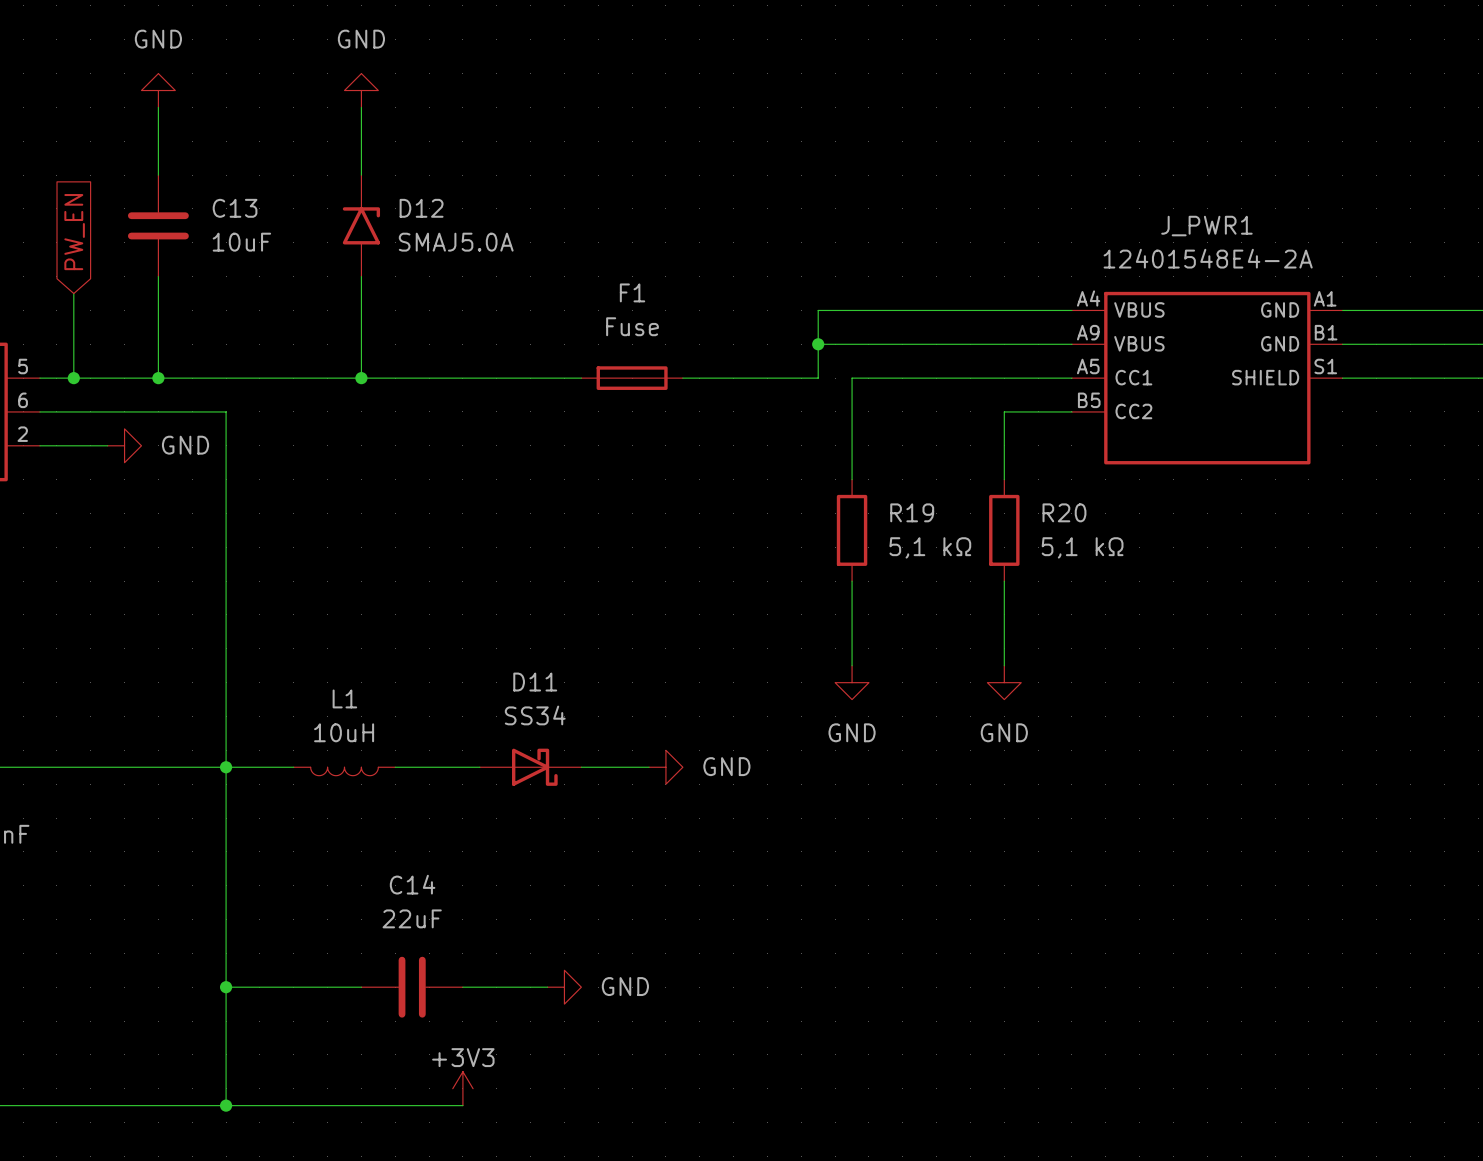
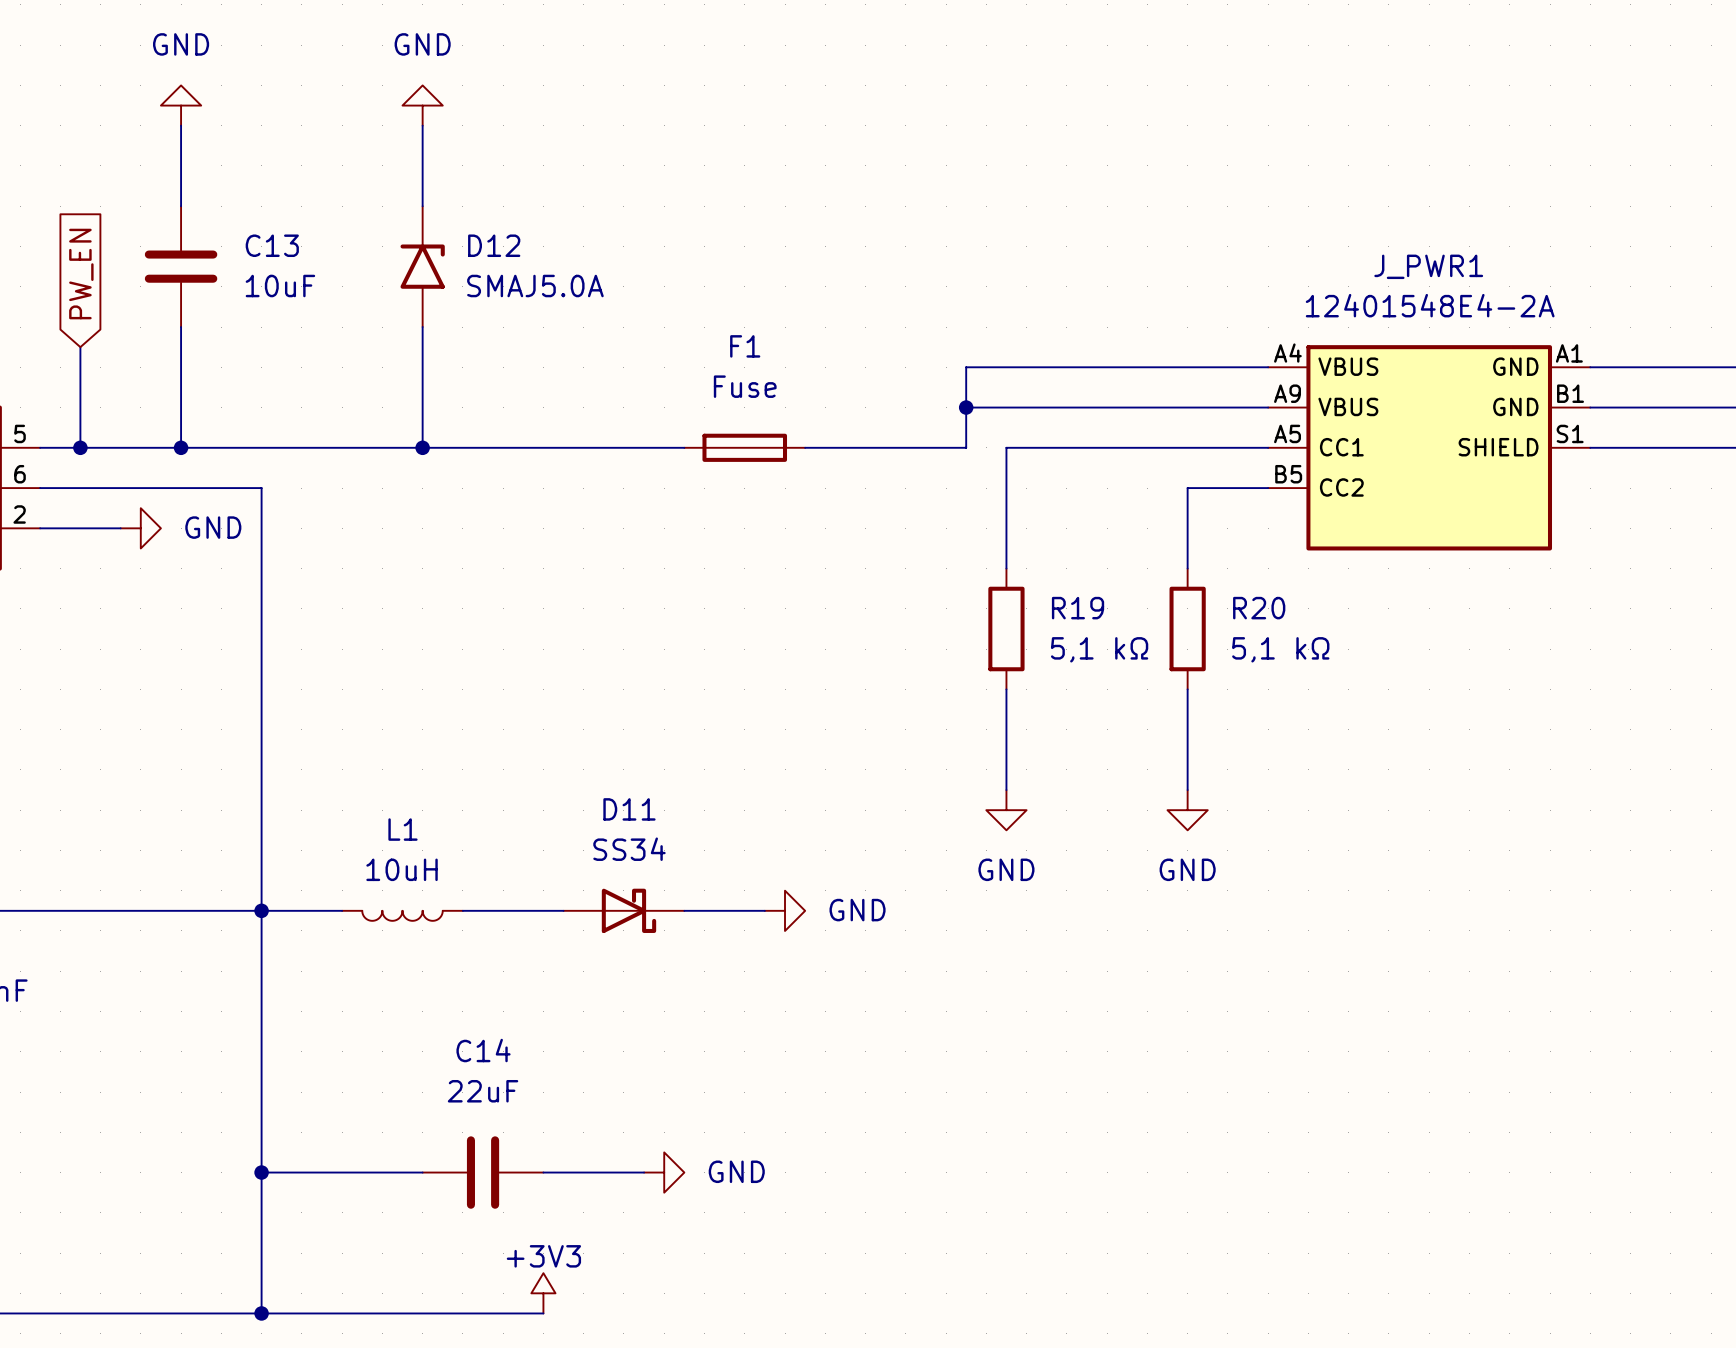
power symbol shape: [452, 1071, 474, 1106] -> [531, 1273, 556, 1314]

